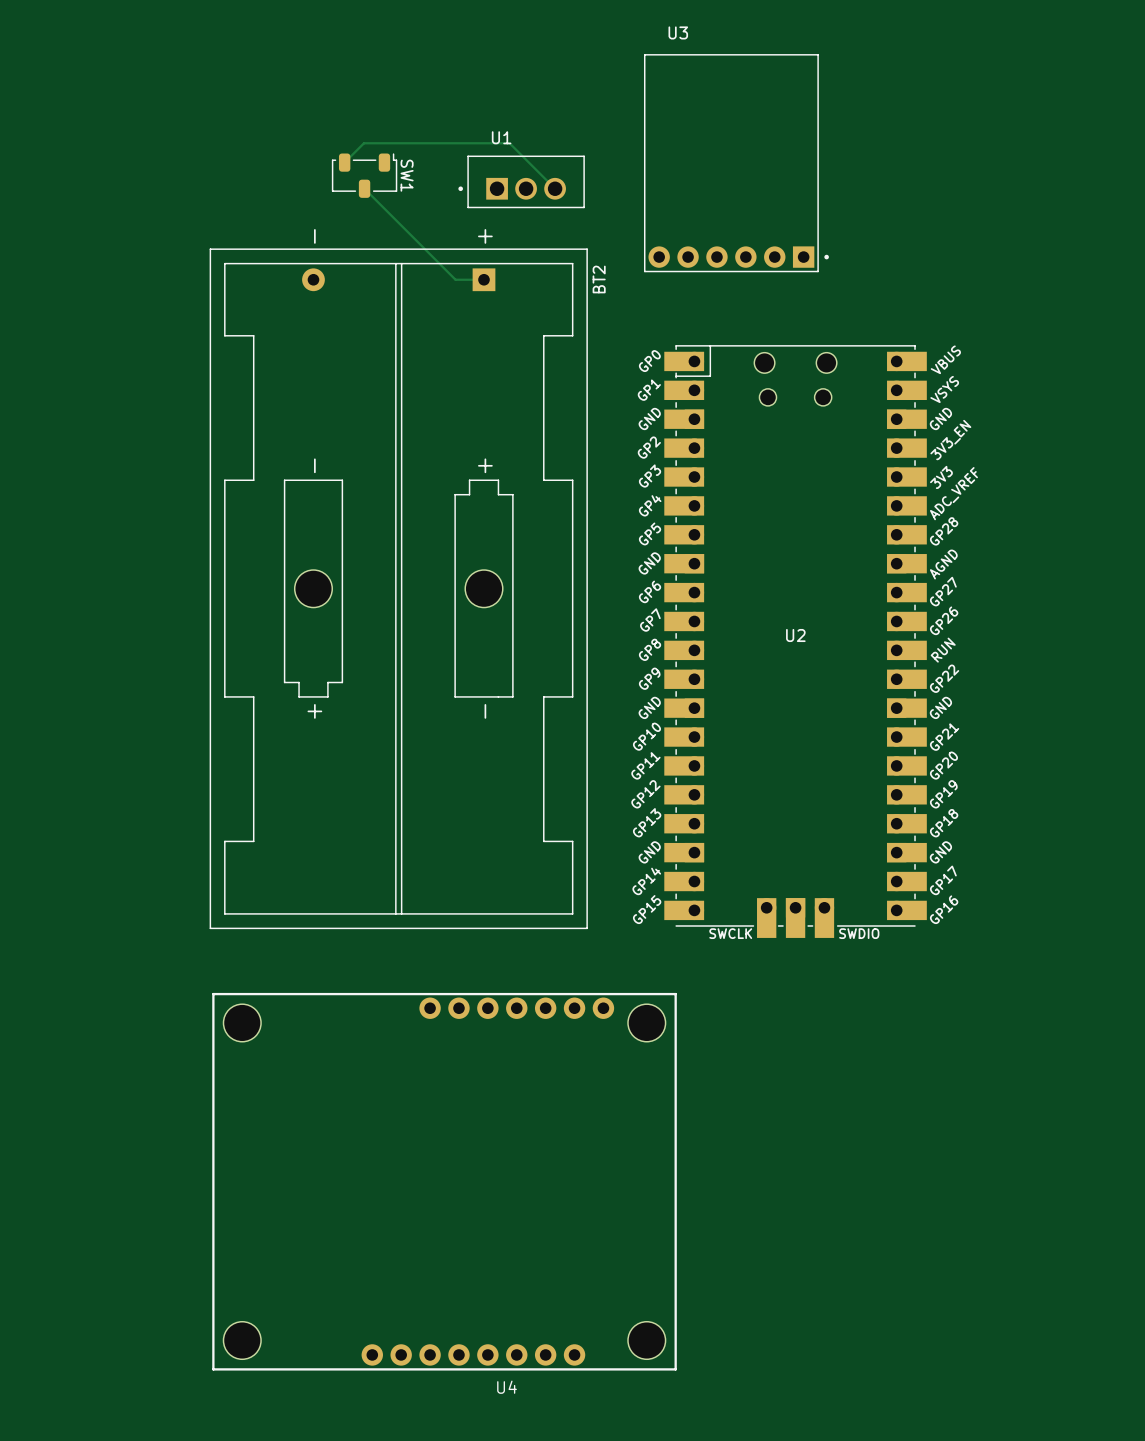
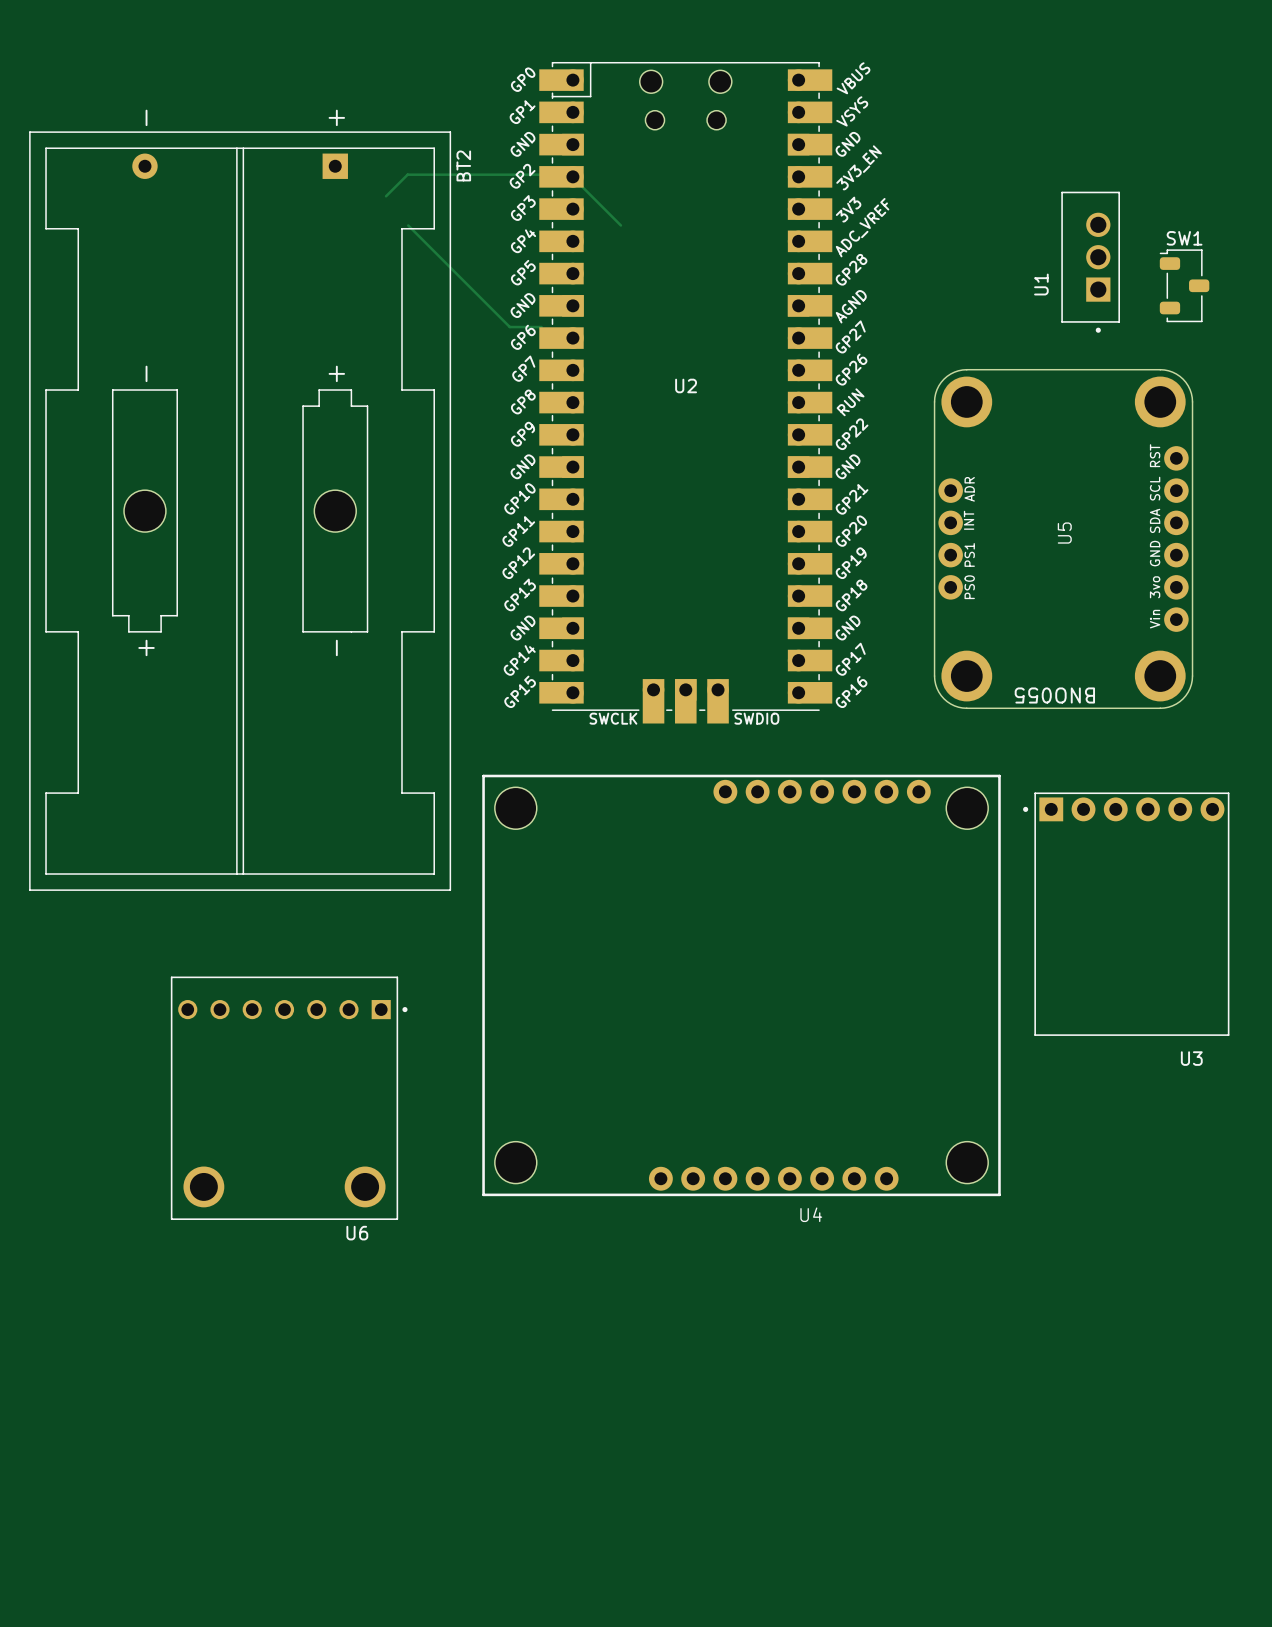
U3 rotation: 0° (736, 163) -> 180° (1126, 914)
U3 position: (736, 163) -> (1126, 914)
SW1 rotation: 0° (364, 175) -> 90° counterclockwise (1184, 285)
SW1 position: (364, 175) -> (1184, 285)
U1 rotation: 0° (521, 181) -> 90° counterclockwise (1090, 262)
U1 position: (521, 181) -> (1090, 262)
U5: none -> (1063, 538)
BT2 position: (398, 588) -> (240, 511)
U2 position: (795, 641) -> (685, 392)
U6: none -> (289, 1098)
U4 position: (444, 1181) -> (741, 985)

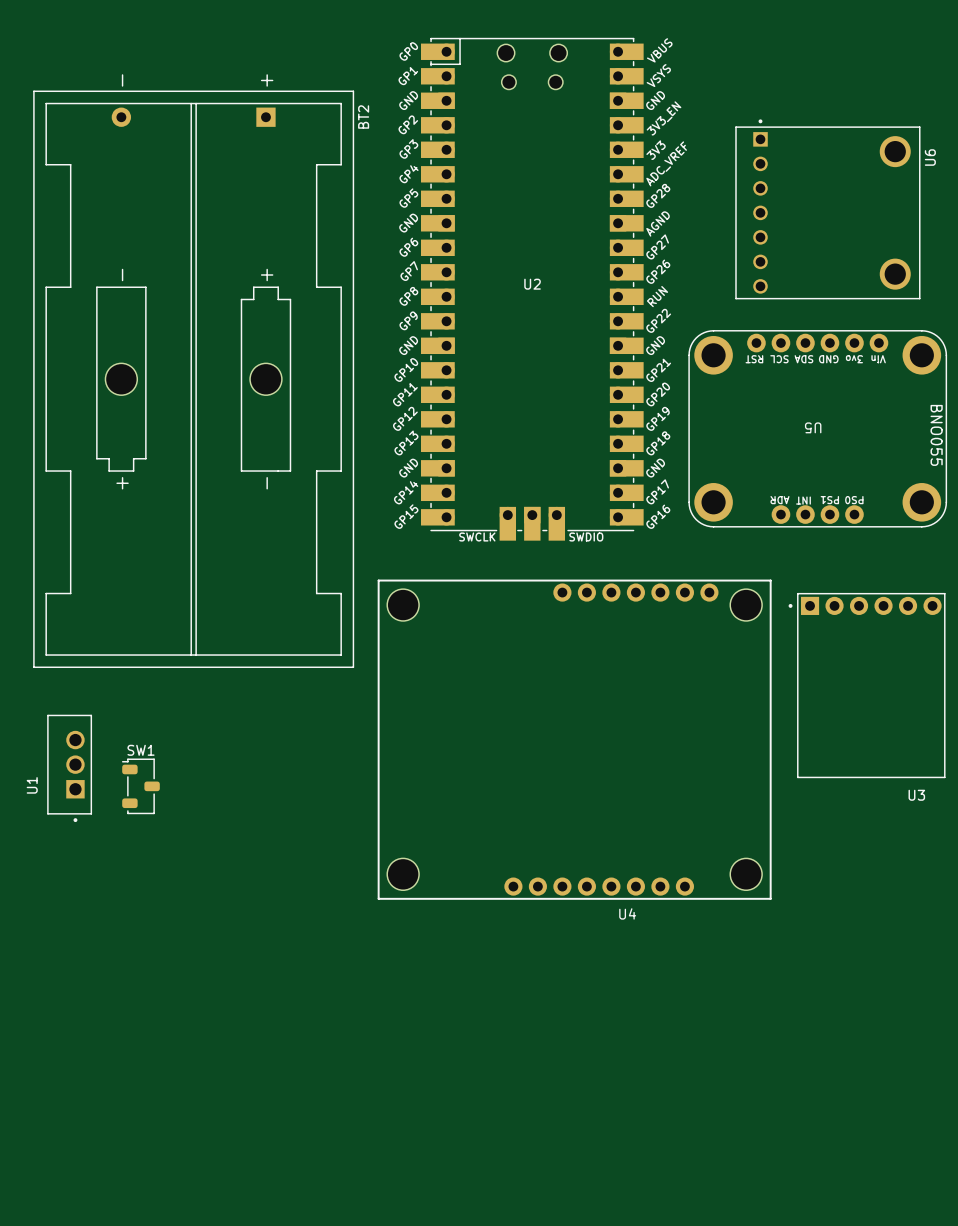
track: (386, 196) (407, 174) (570, 174) (620, 225) -> none
track: (408, 225) (509, 327) (541, 327) -> none
U1 position: (1090, 262) -> (69, 768)
SW1 position: (1184, 285) -> (140, 786)
U5 footprint: [934, 369, 1193, 709] -> [688, 330, 947, 528]
U6 rotation: 0° (289, 1098) -> 90° counterclockwise (827, 209)
U6 position: (289, 1098) -> (827, 209)

